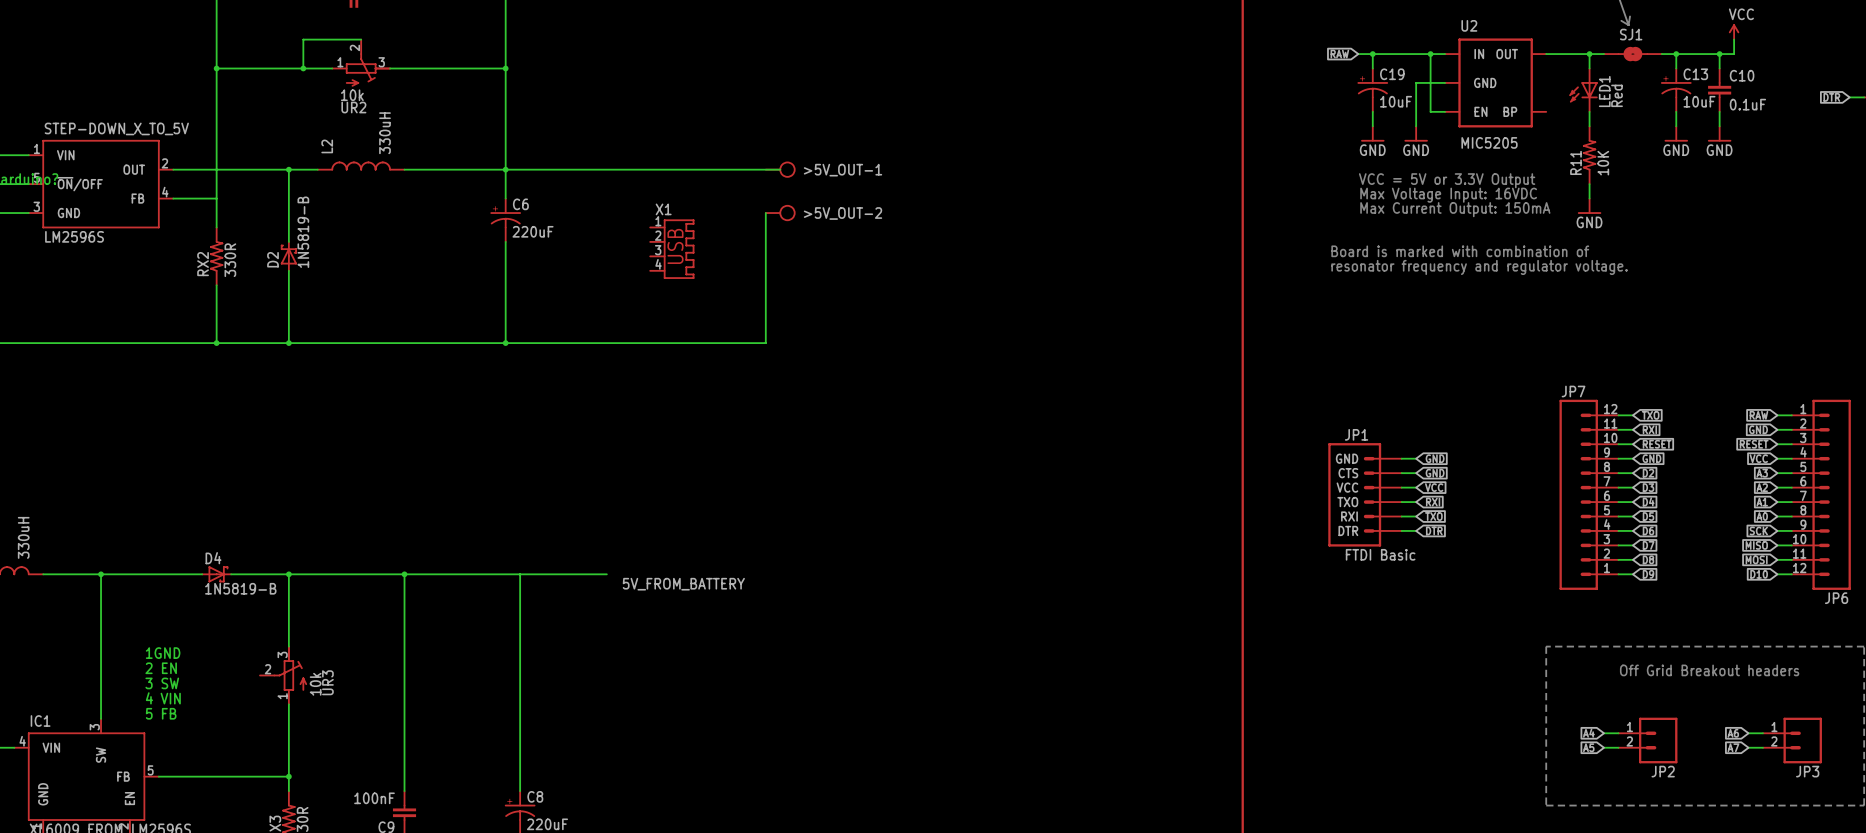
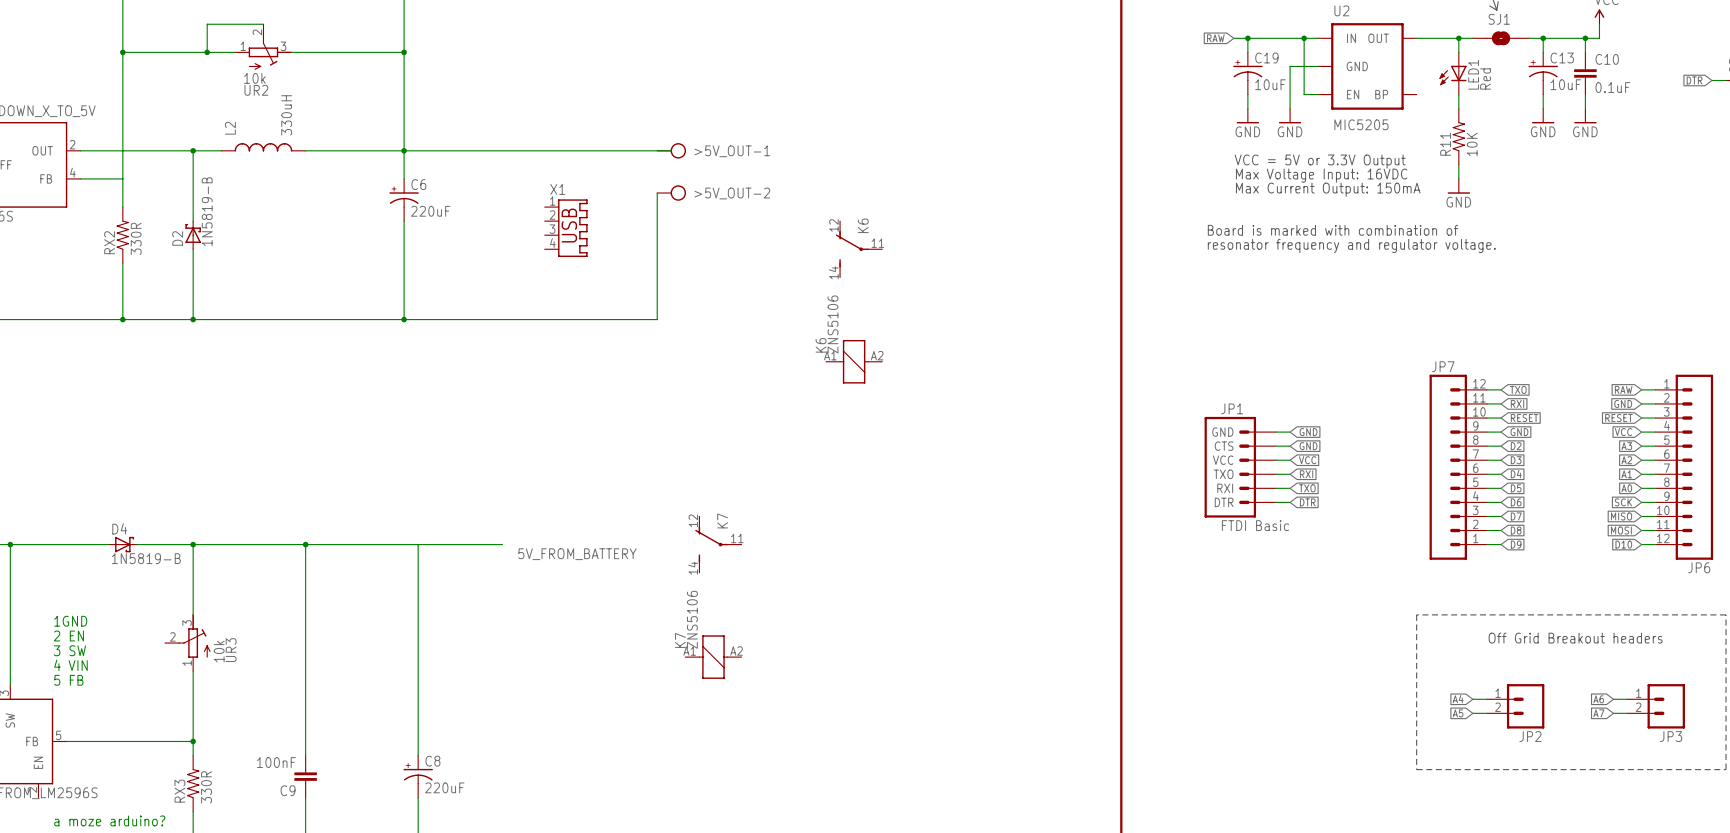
K6: none -> (859, 249)
K6: none -> ZNS5106 (854, 361)
K7: none -> (718, 544)
K7: none -> ZNS5106 (713, 657)

